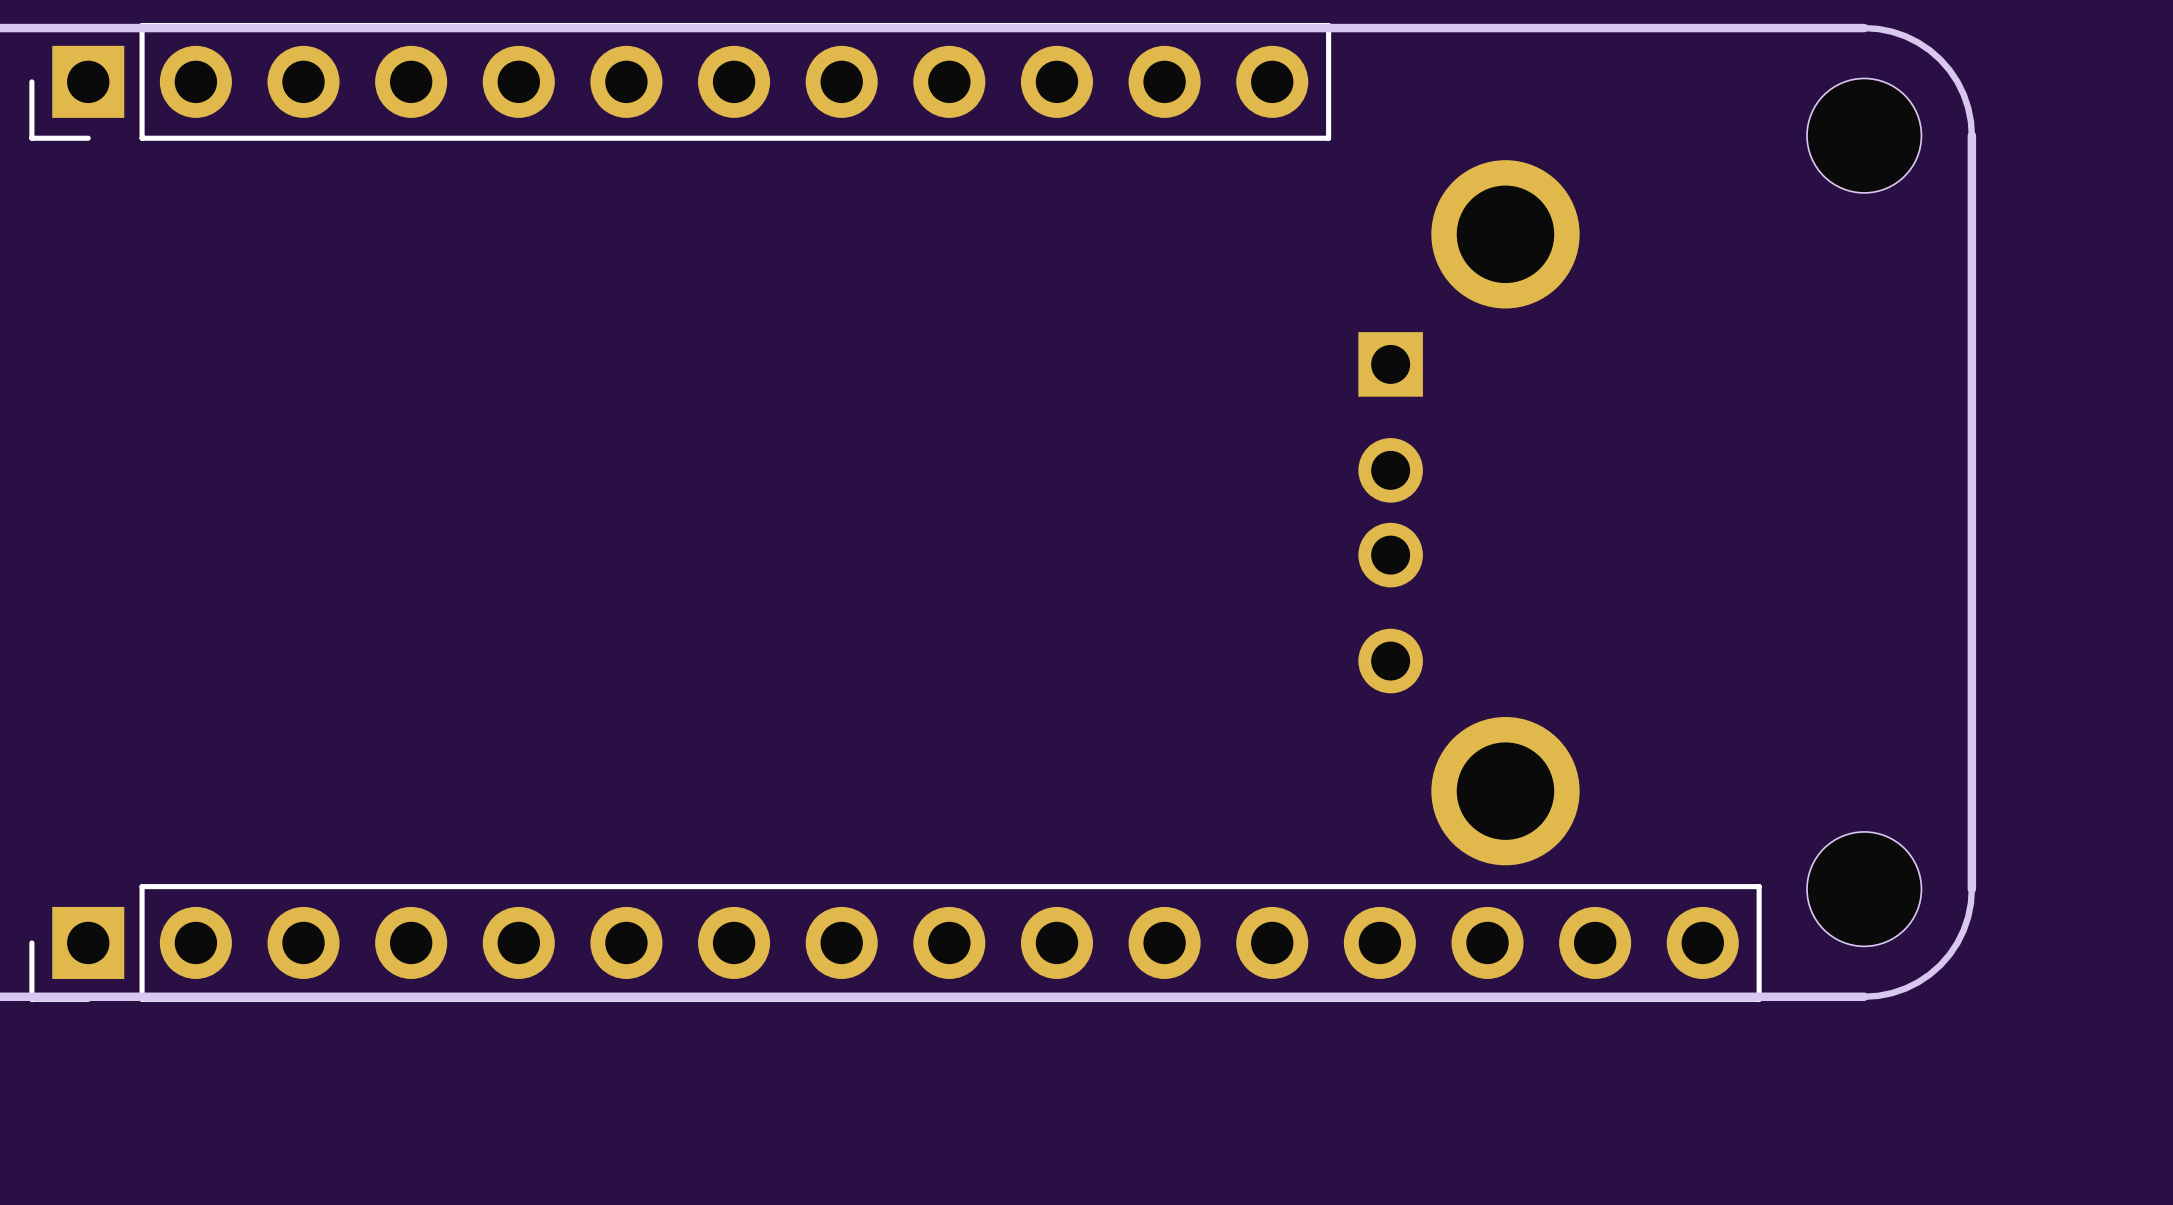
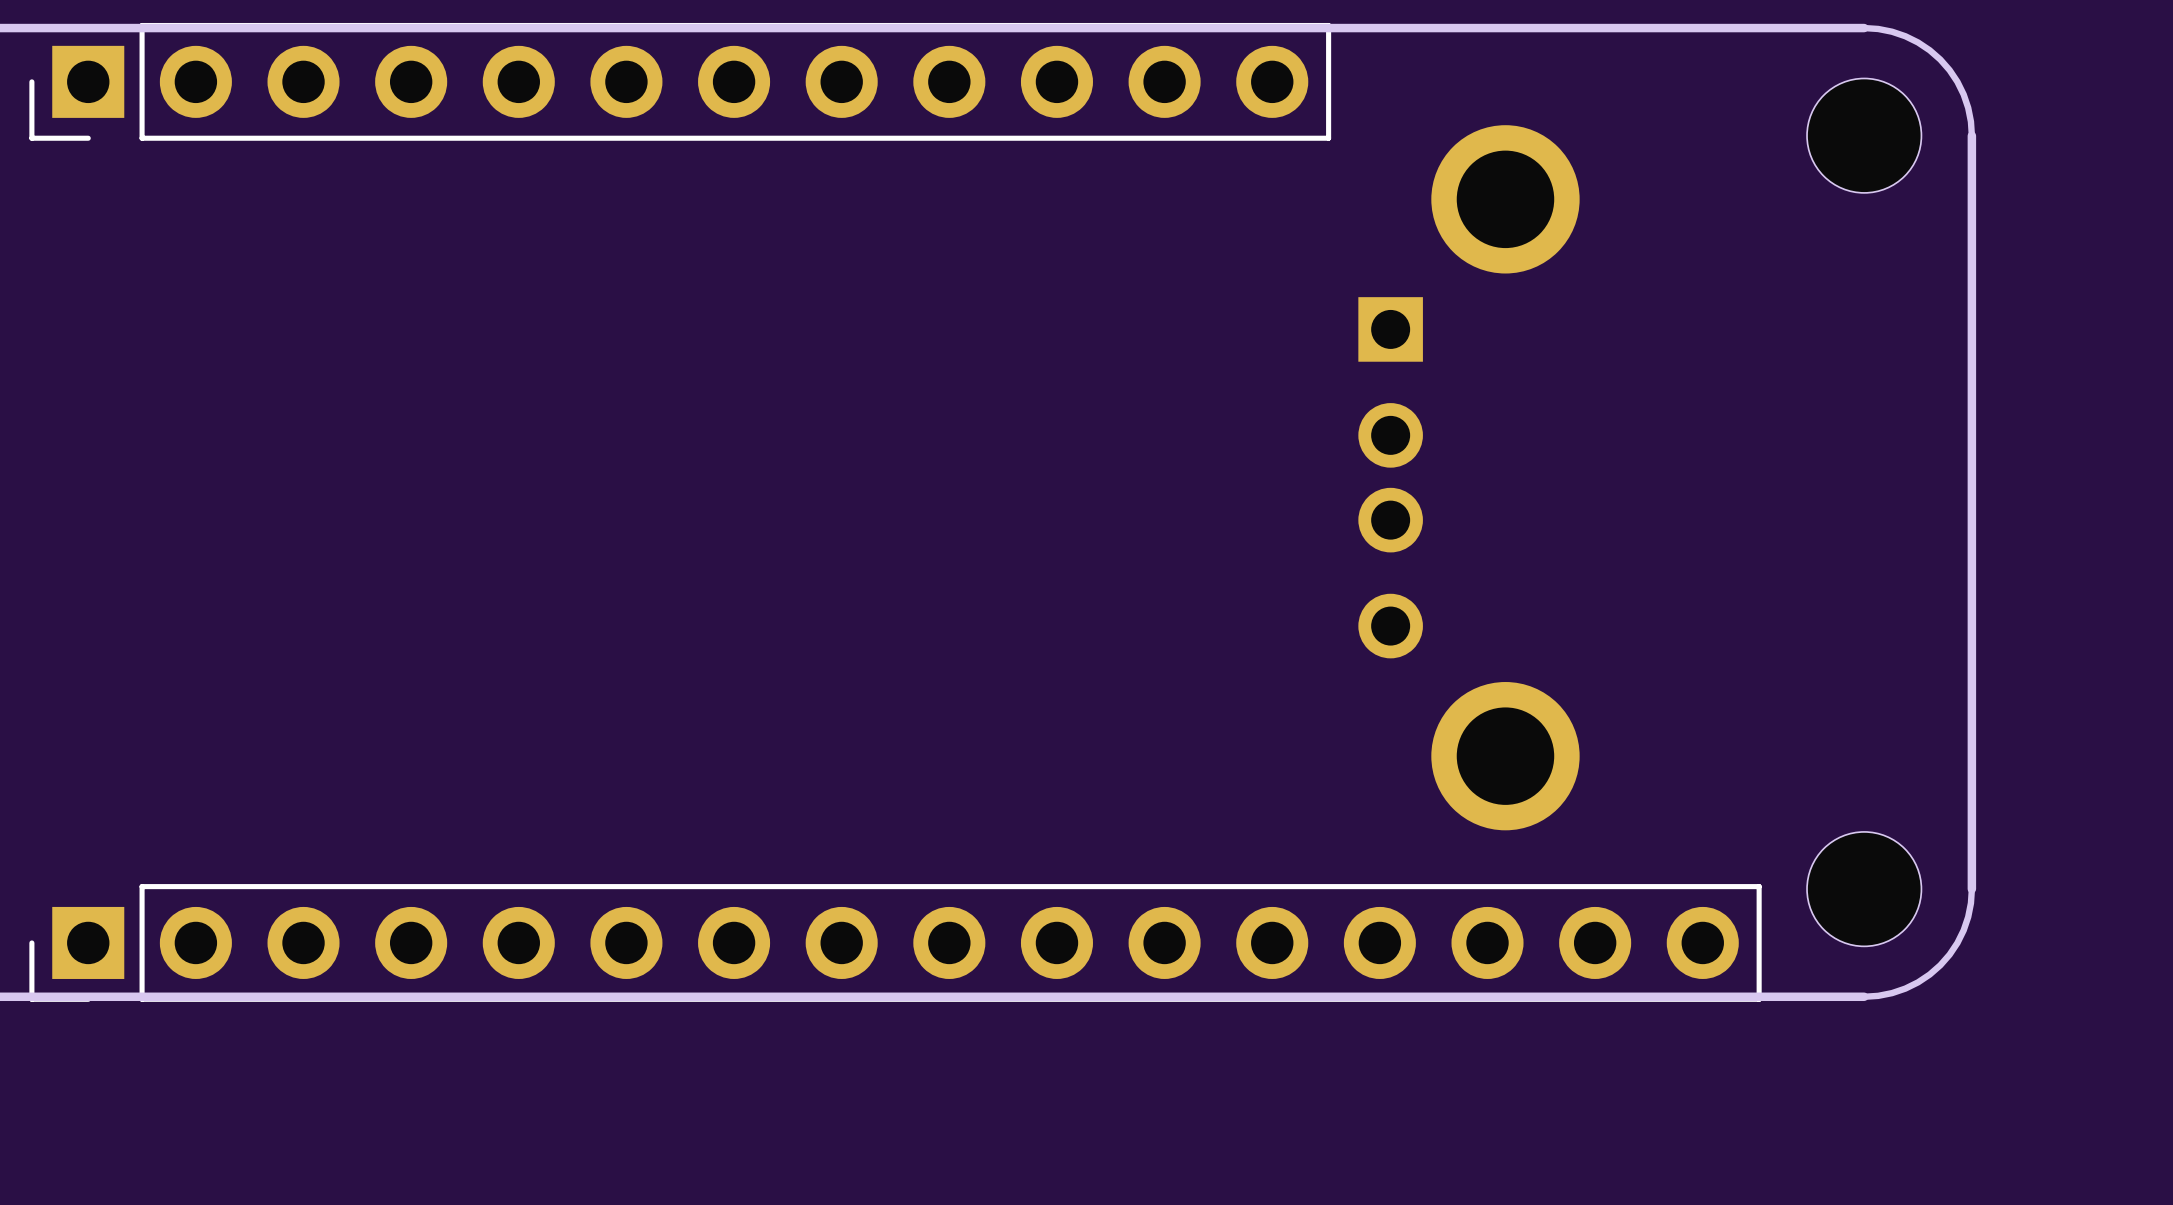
part position: (1468, 512) -> (1468, 477)

